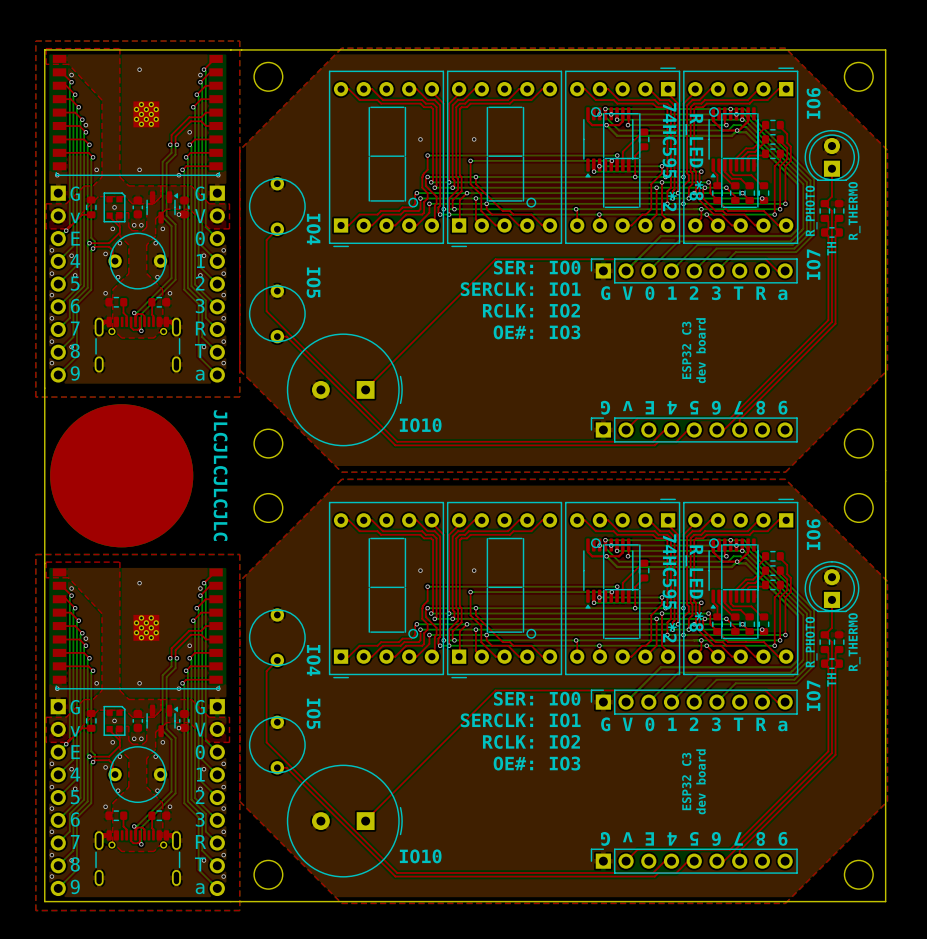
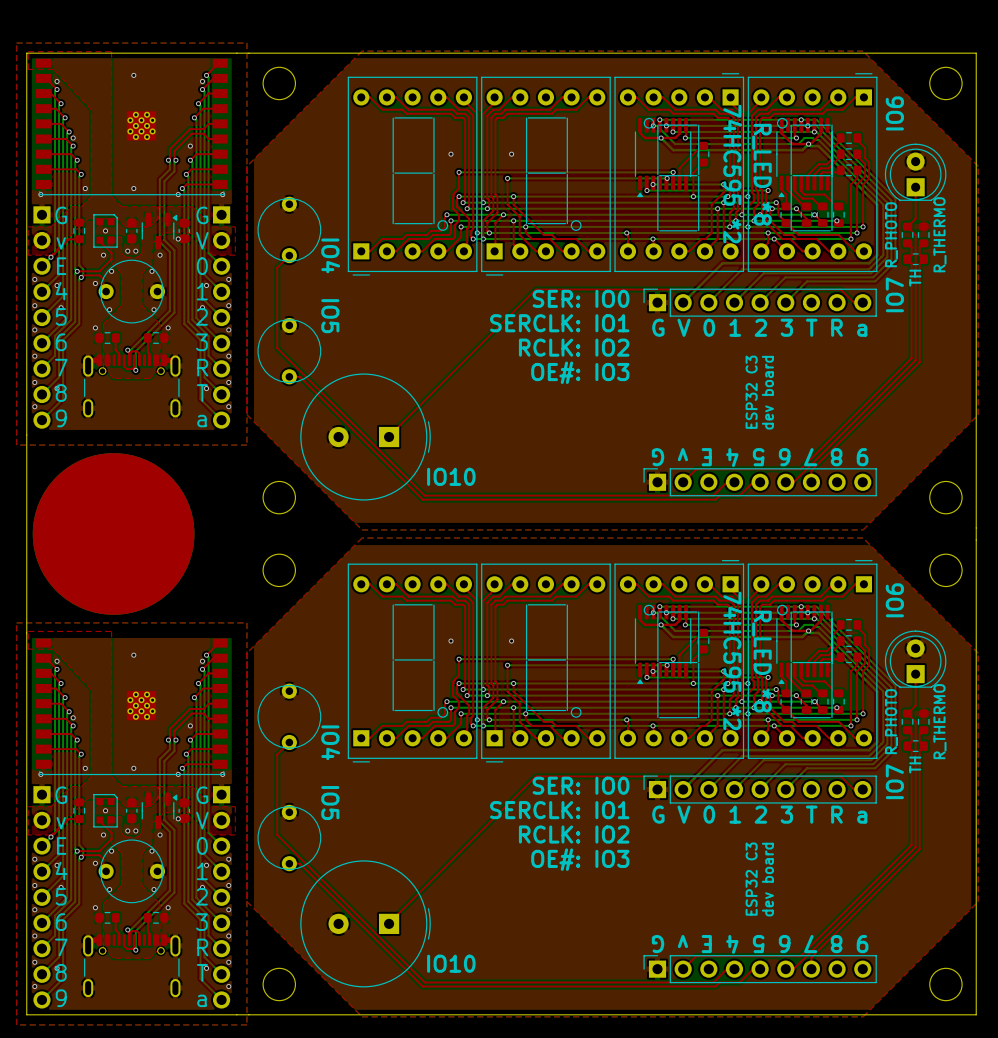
text: JLCJLCJLCJLC (220, 475) -> none

